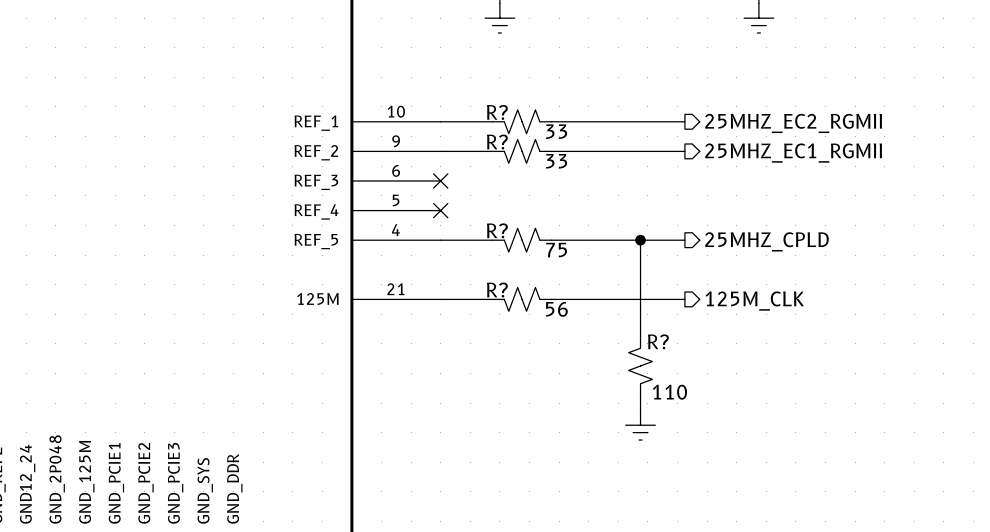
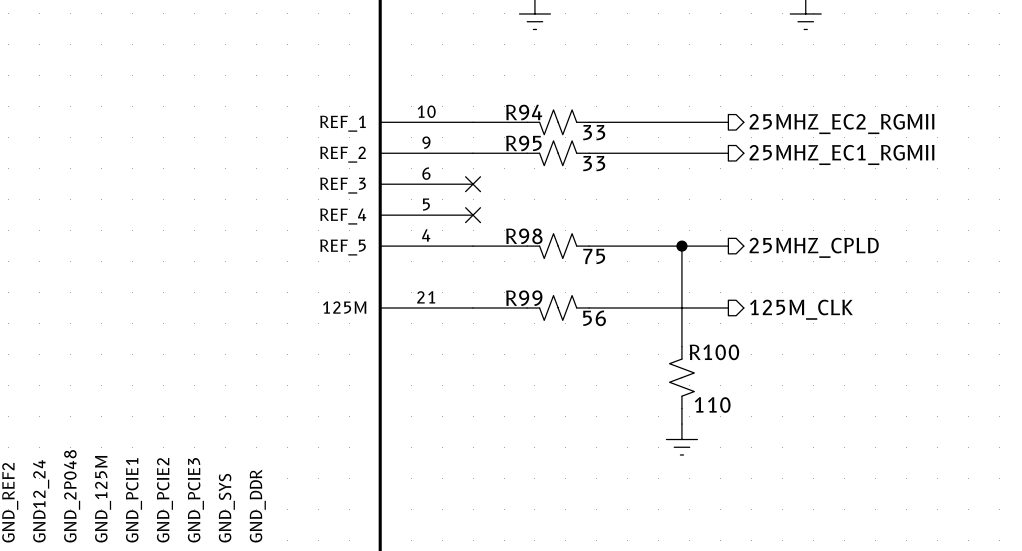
R? name: R? (497, 112) -> R94 (524, 112)
R? name: R? (497, 142) -> R95 (523, 143)
R? name: R? (497, 230) -> R98 (524, 236)
R? name: R? (497, 290) -> R99 (524, 298)
R? name: R? (658, 341) -> R100 (714, 352)

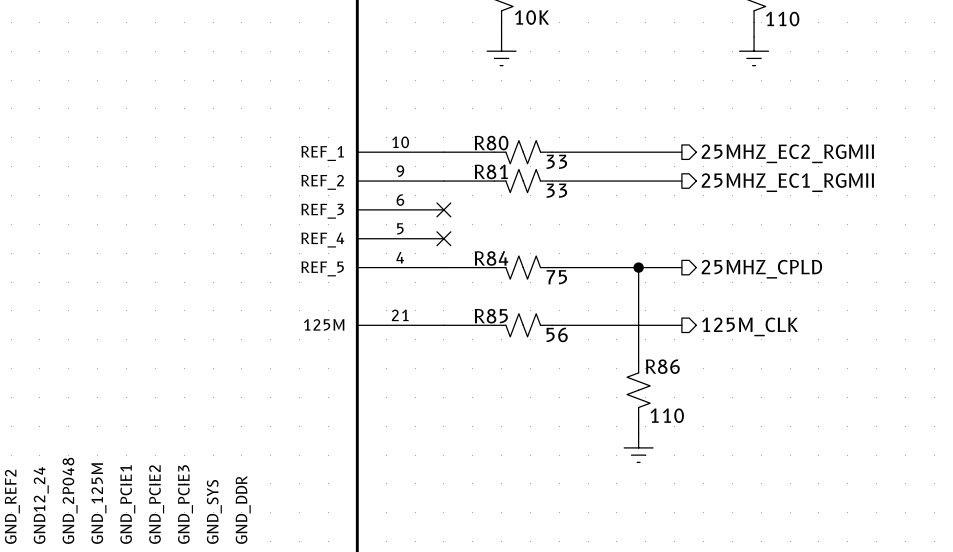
R94 name: R94 (524, 112) -> R80 (491, 143)
R95 name: R95 (523, 143) -> R81 (491, 171)
R98 name: R98 (524, 236) -> R84 (491, 258)
R99 name: R99 (524, 298) -> R85 (491, 316)
R100 name: R100 (714, 352) -> R86 (662, 366)

